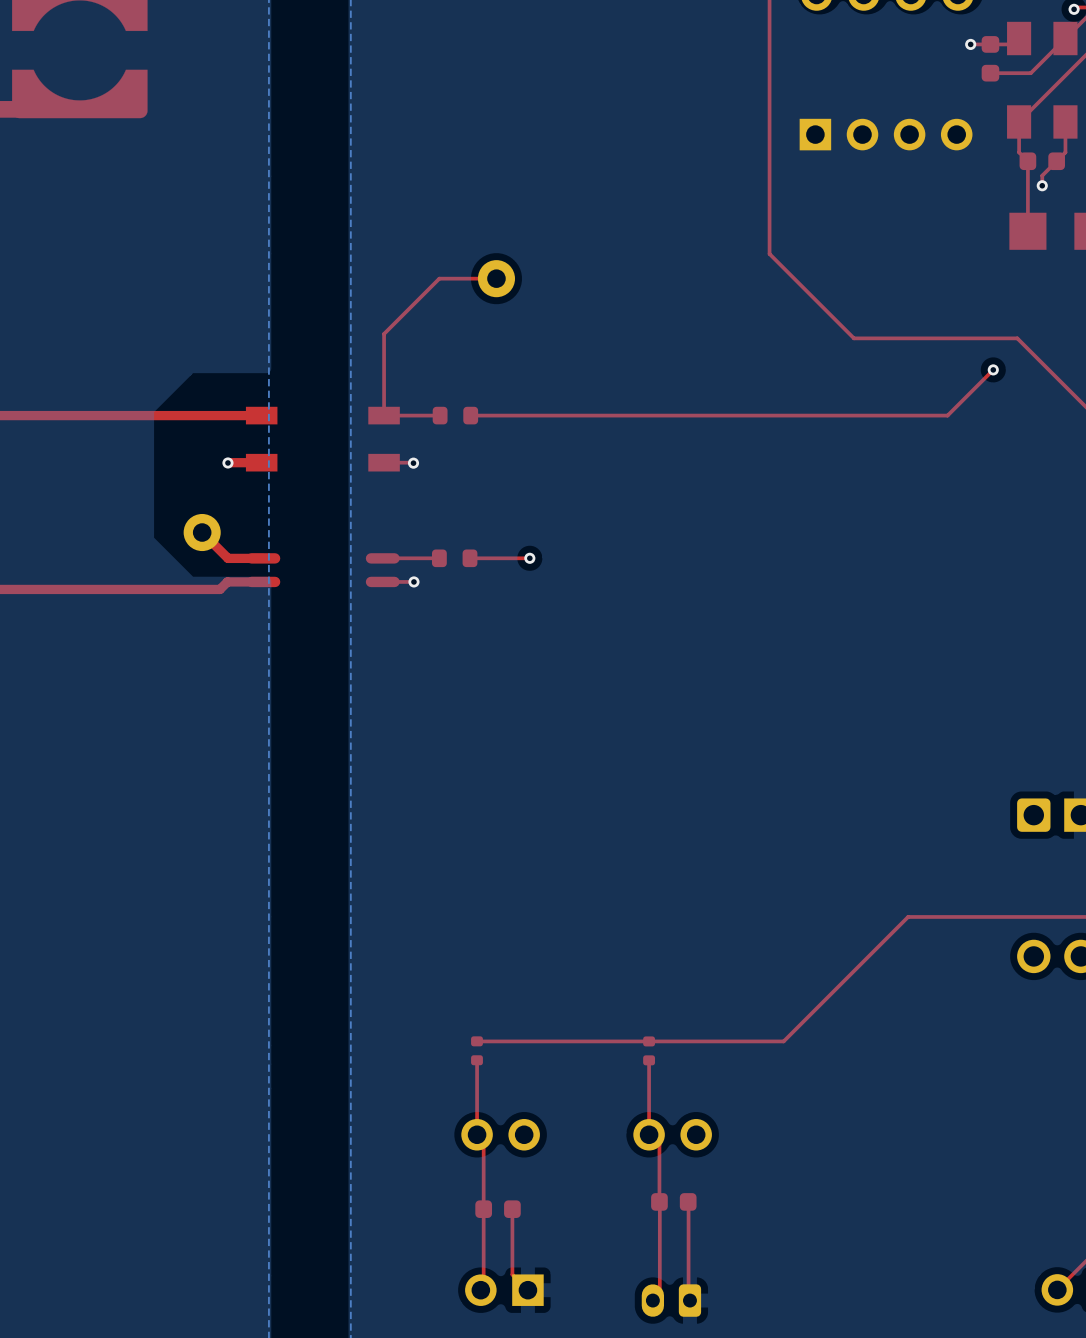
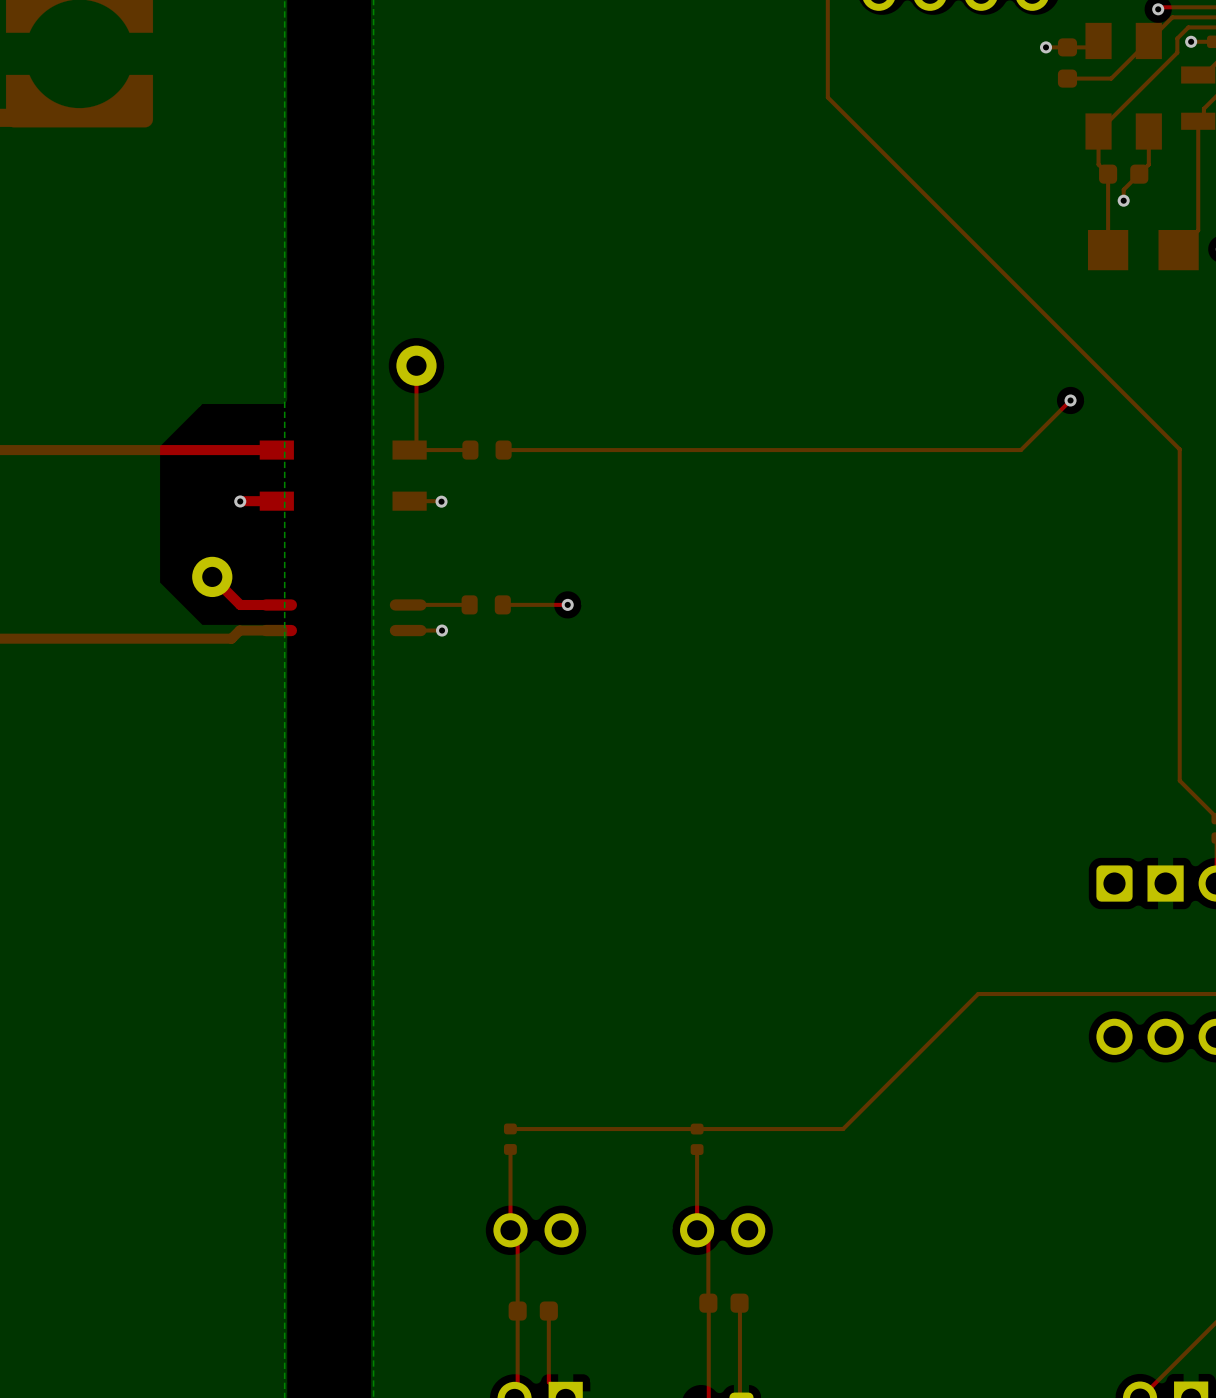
top track: (769, 90) (769, 253) (853, 338) (1017, 338) -> (827, 97) (1096, 366)
part: (886, 134) -> none
top track: (496, 278) (439, 278) (384, 333) (384, 415) -> (416, 365) (416, 443) (409, 450)
part position: (496, 278) -> (416, 365)

